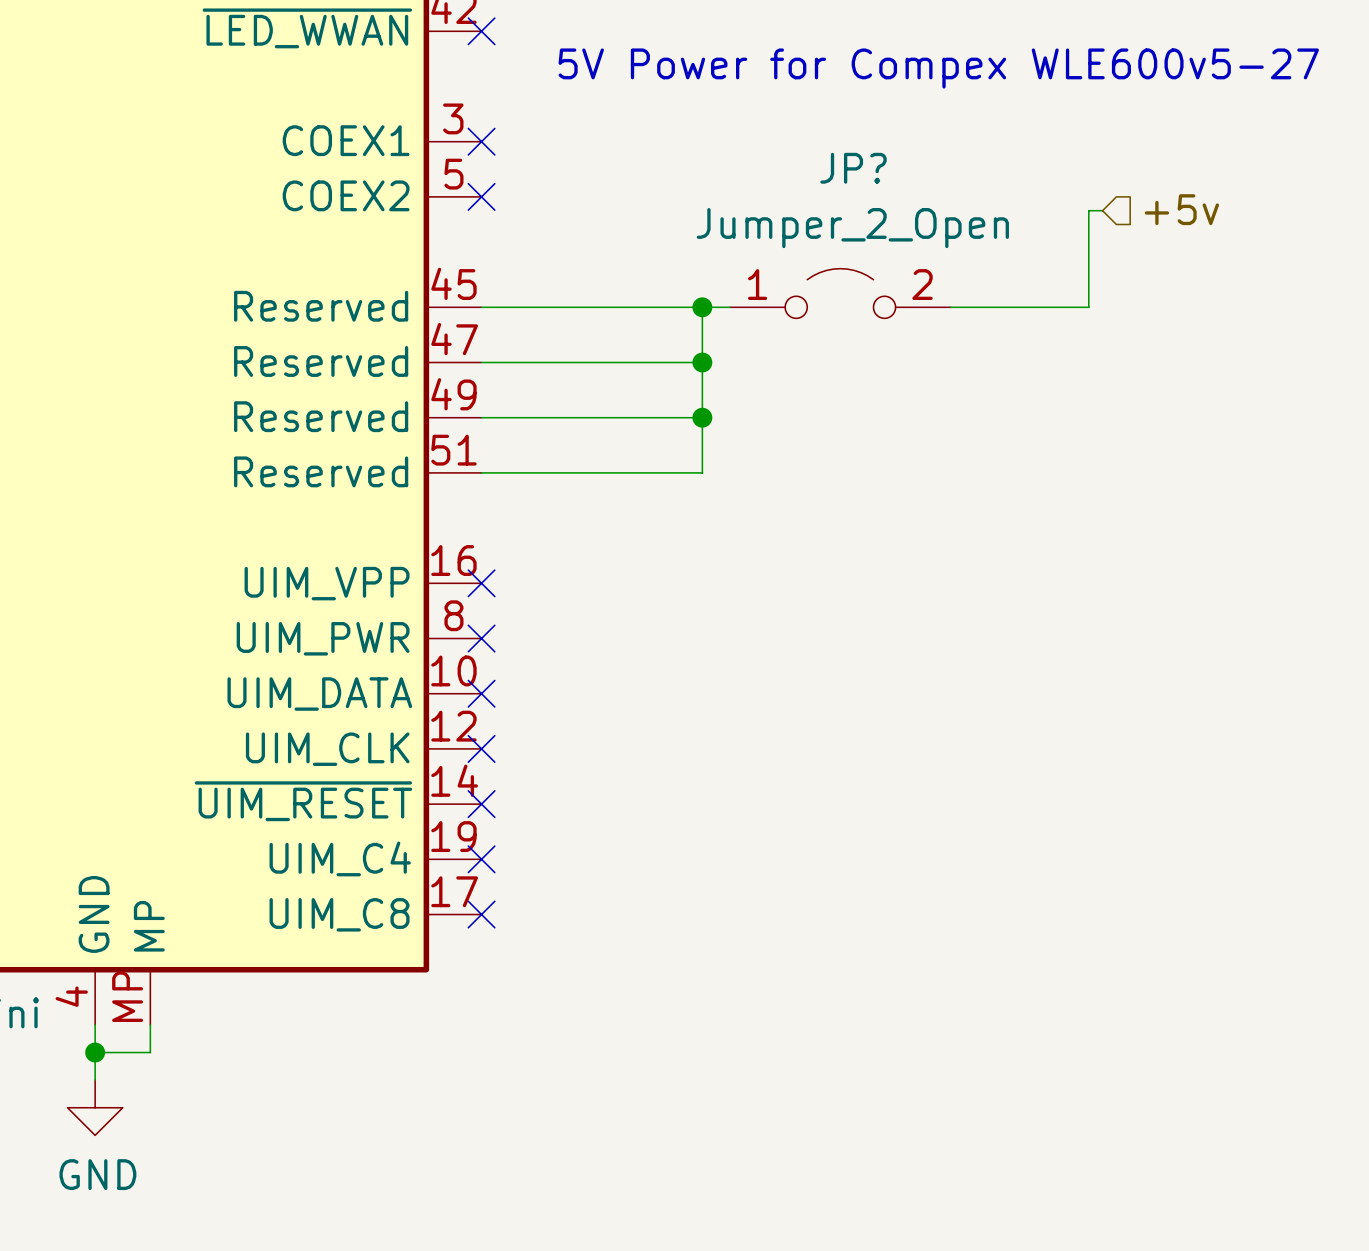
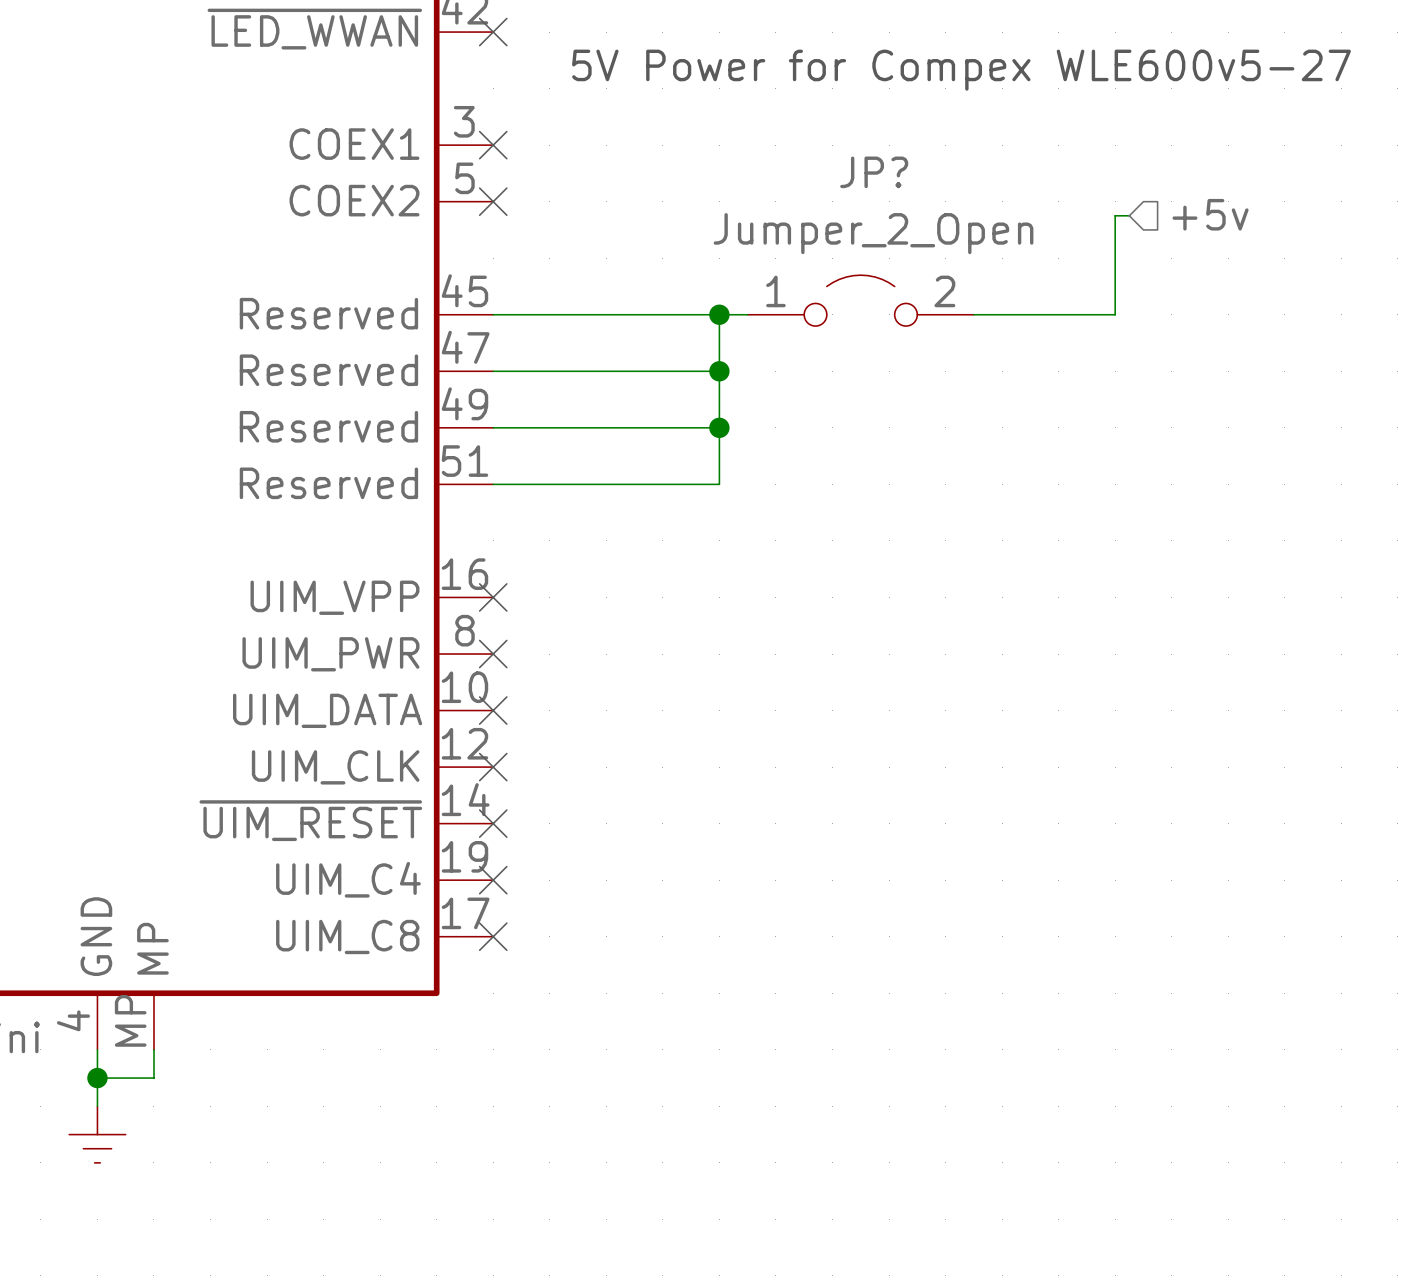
power symbol shape: [67, 1080, 123, 1136] -> [69, 1106, 126, 1163]
power symbol text: GND (97, 1174) -> none

